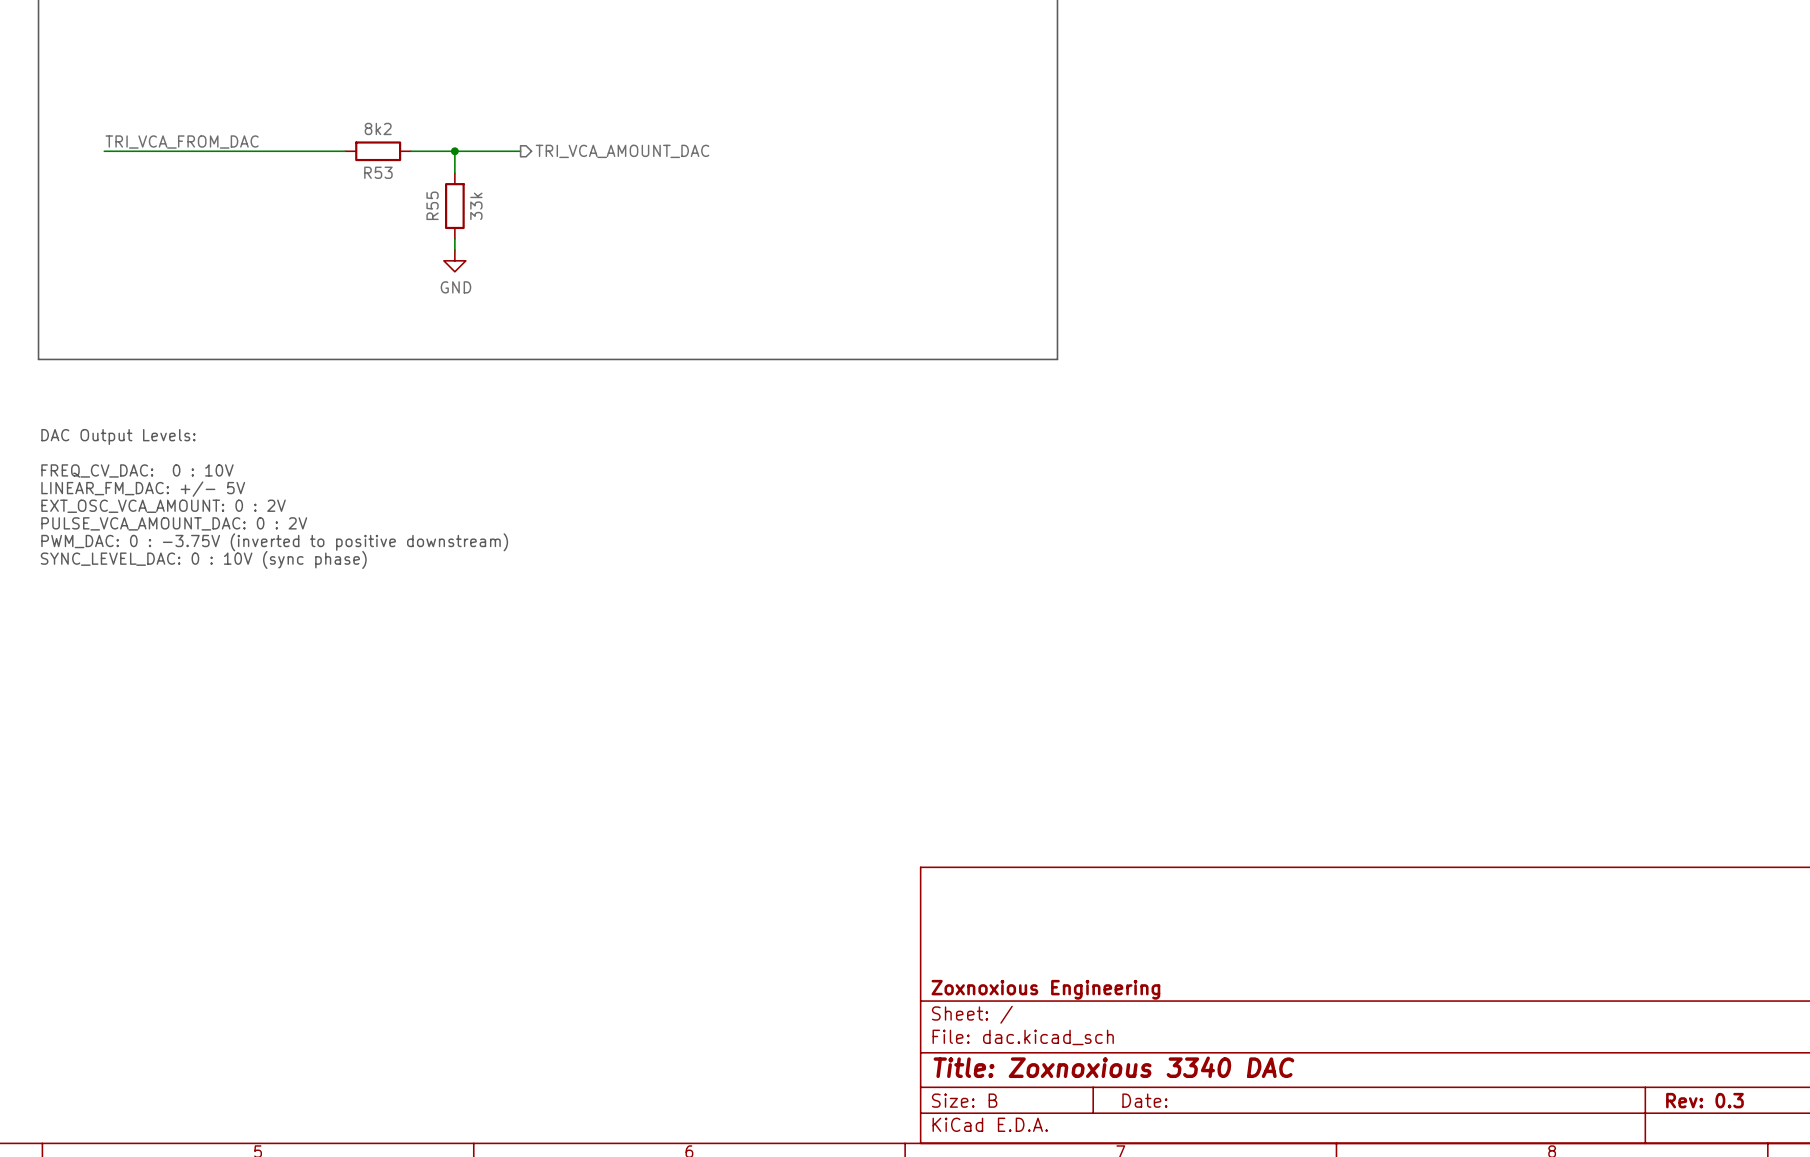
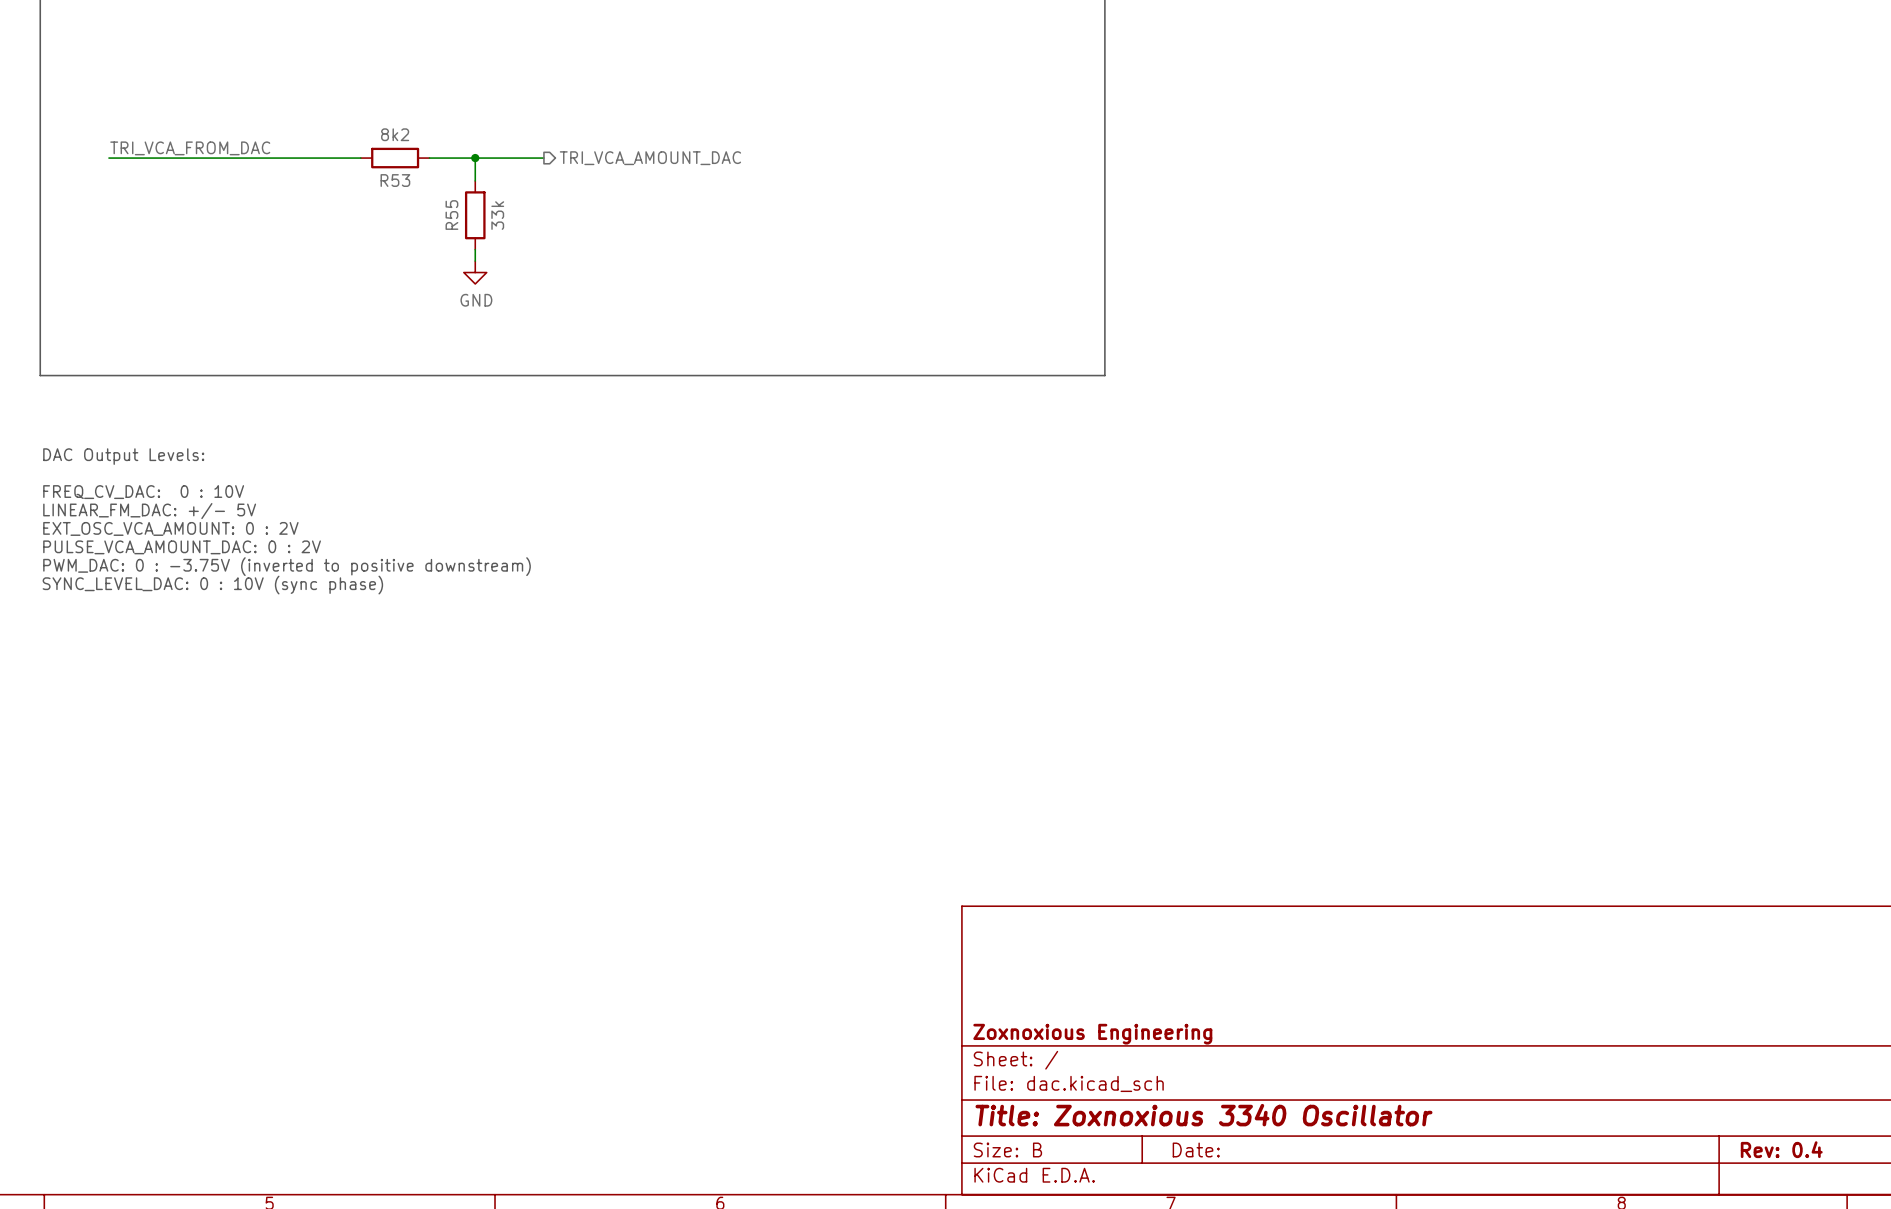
title block: Title: Zoxnoxious 3340 DAC (1113, 1067) -> Title: Zoxnoxious 3340 Oscillator (1203, 1115)
title block: Rev: 0.3 (1704, 1100) -> Rev: 0.4 (1781, 1149)

